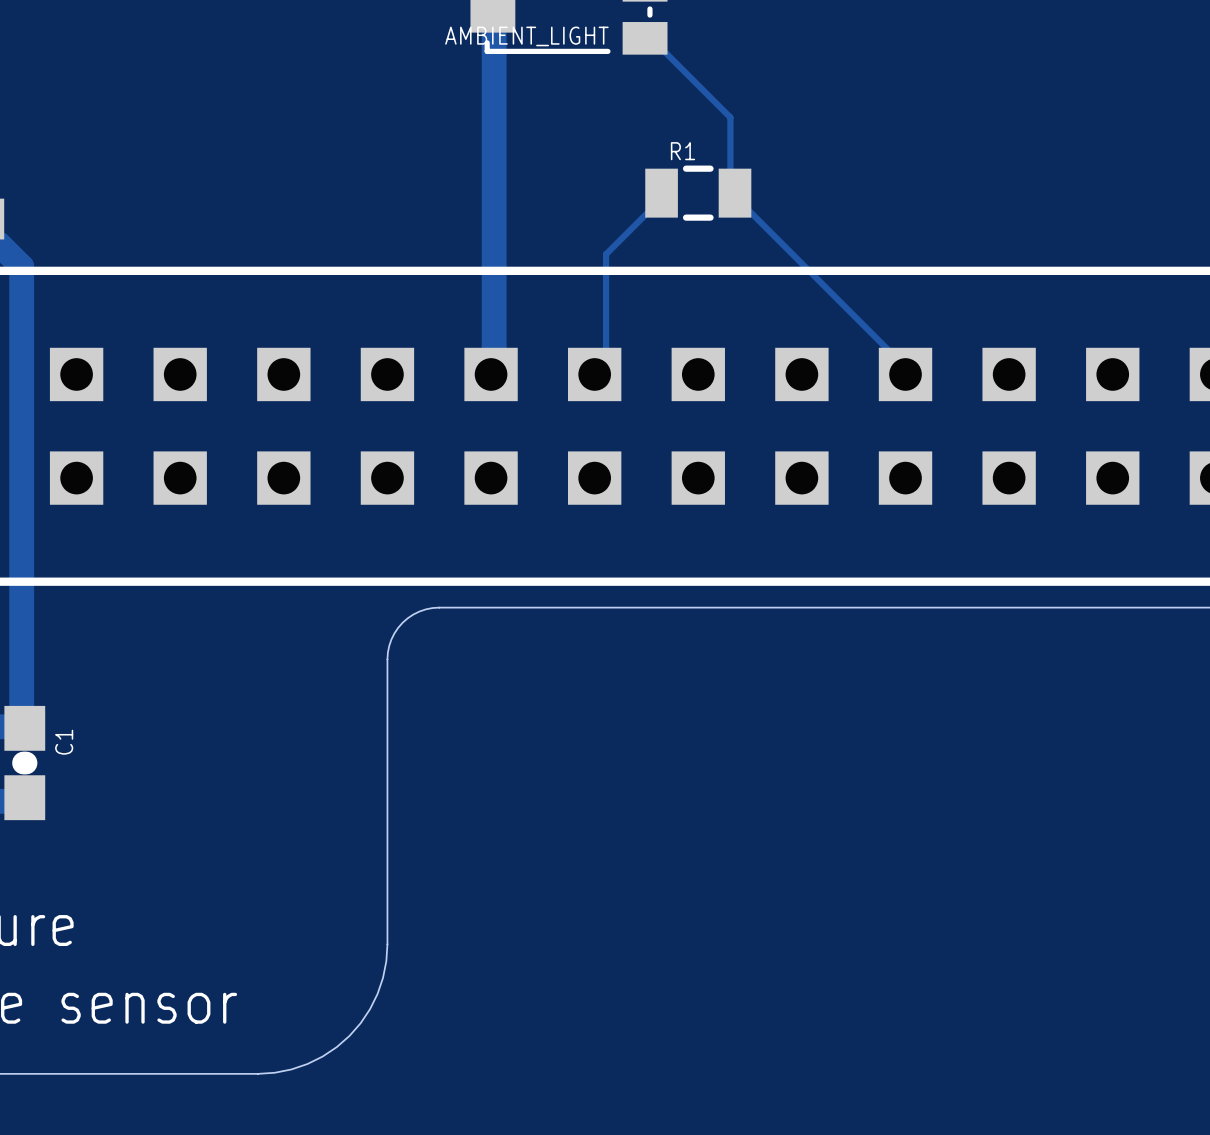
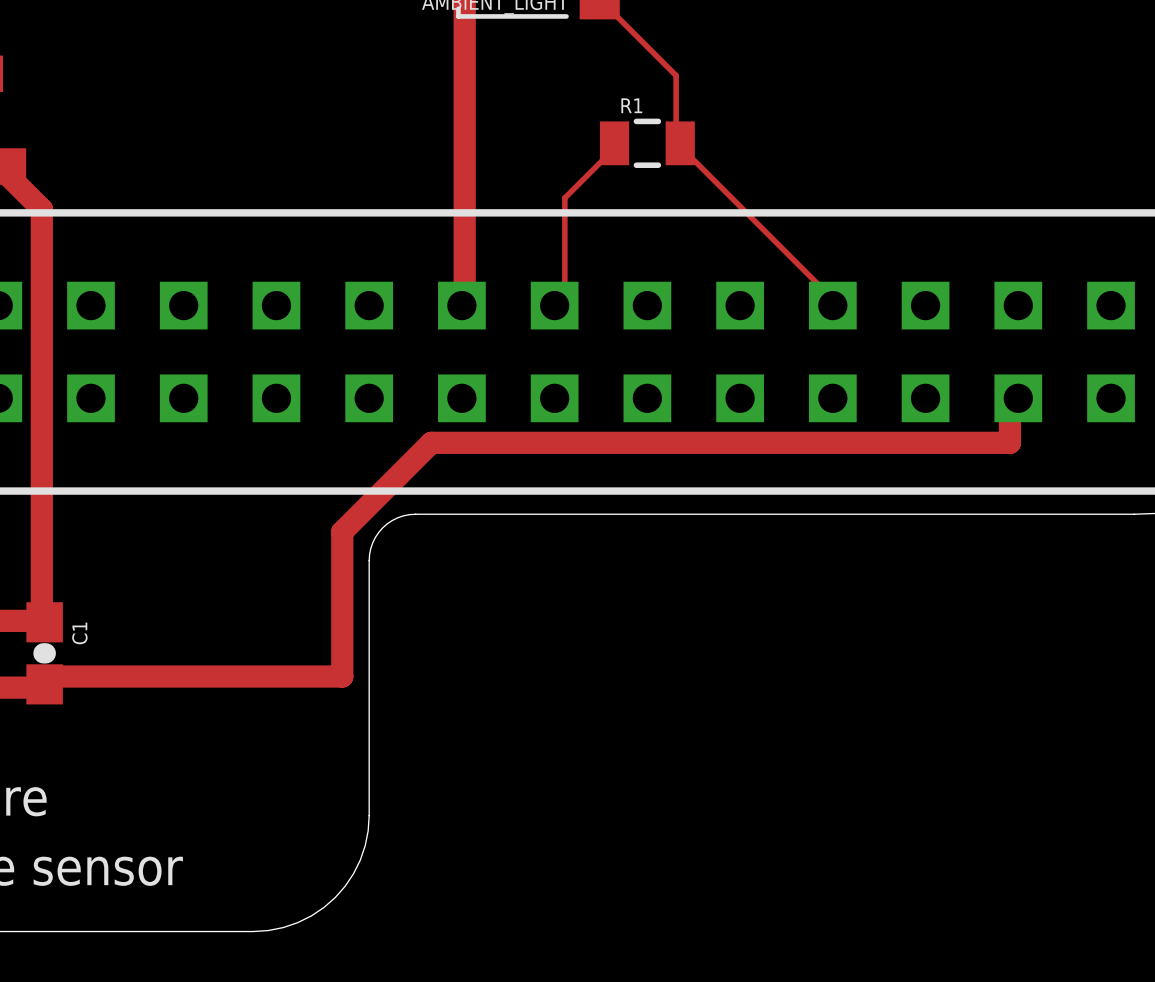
track: none -> (1018, 398) (1009, 398) (1009, 442) (431, 442) (342, 531) (342, 676) (52, 676) (44, 684)

